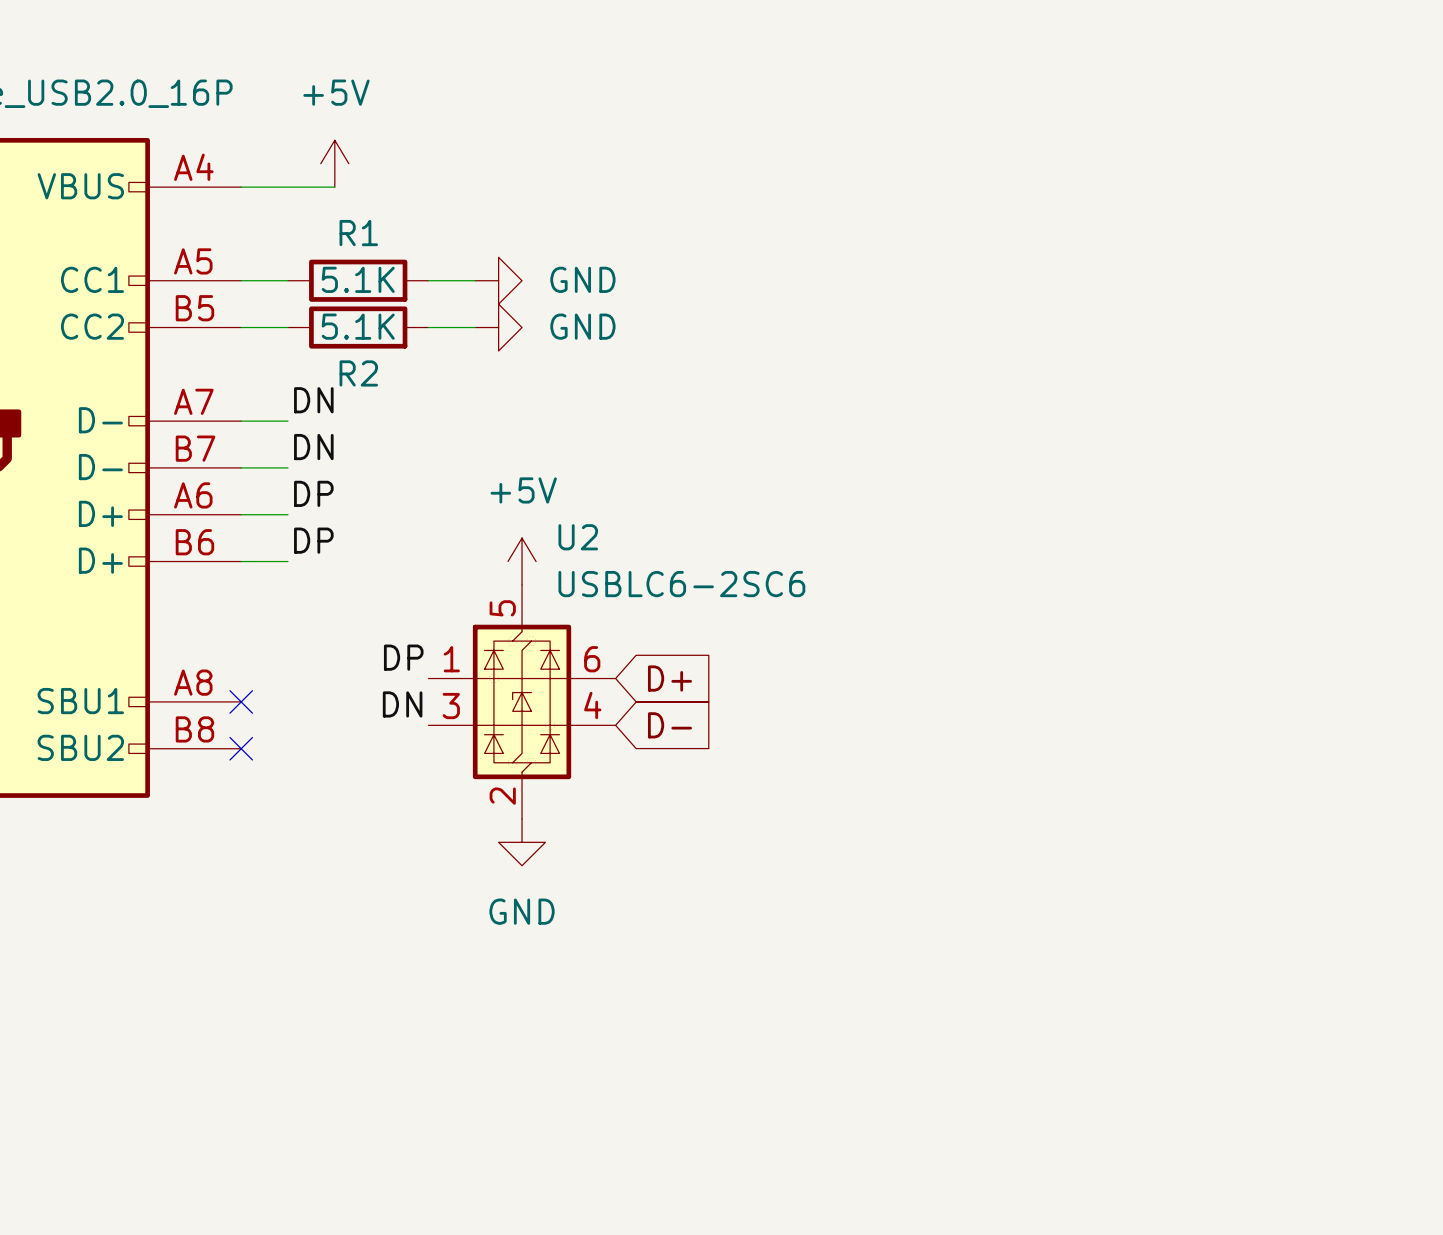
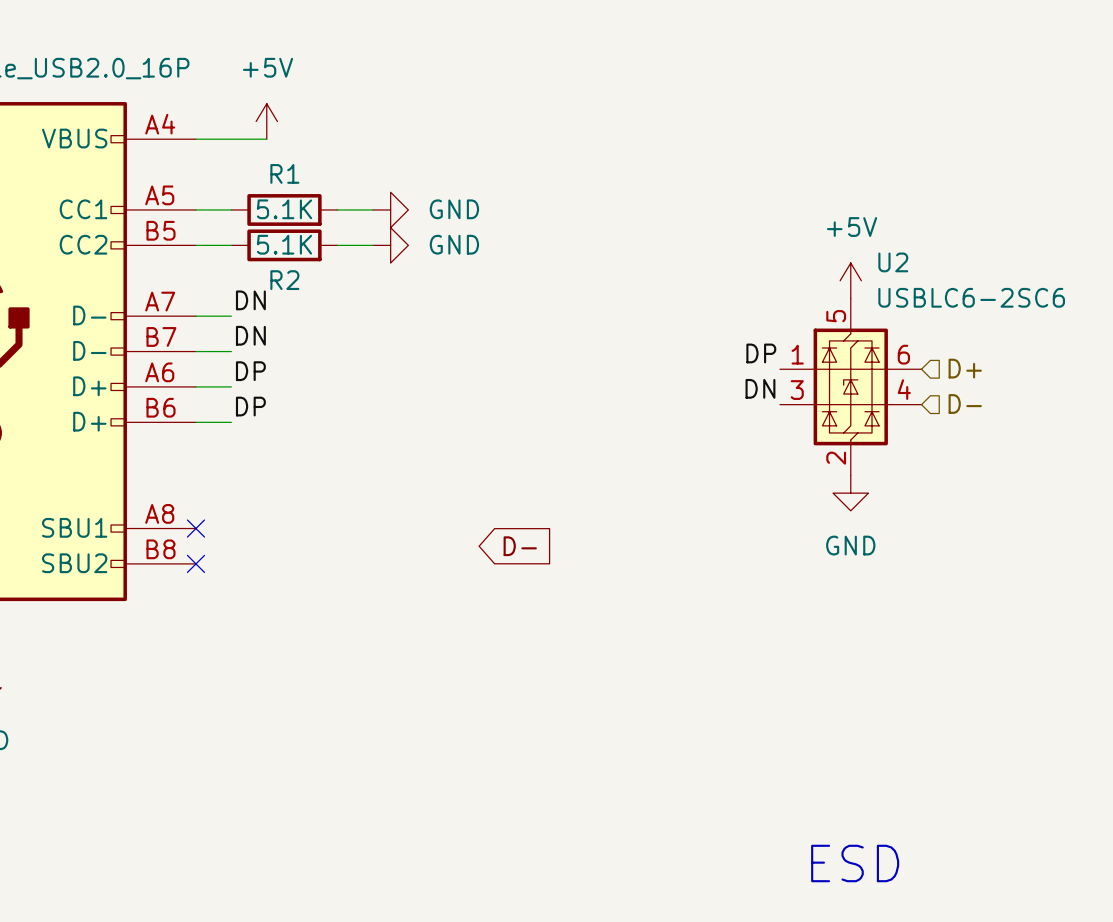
power symbol: none -> +5V (850, 280)
label: none -> DP (761, 353)
hierarchical label: none -> D+ (965, 368)
label: none -> DN (760, 388)
hierarchical label: none -> D- (965, 403)
power symbol: +5V (522, 561) -> none
power symbol: none -> GND (850, 493)
label: DP (403, 657) -> none
global label: D+ (669, 678) -> none
U2 position: (522, 701) -> (850, 386)
label: DN (402, 704) -> none
power symbol: GND (522, 842) -> none
text: none -> ESD (855, 863)

